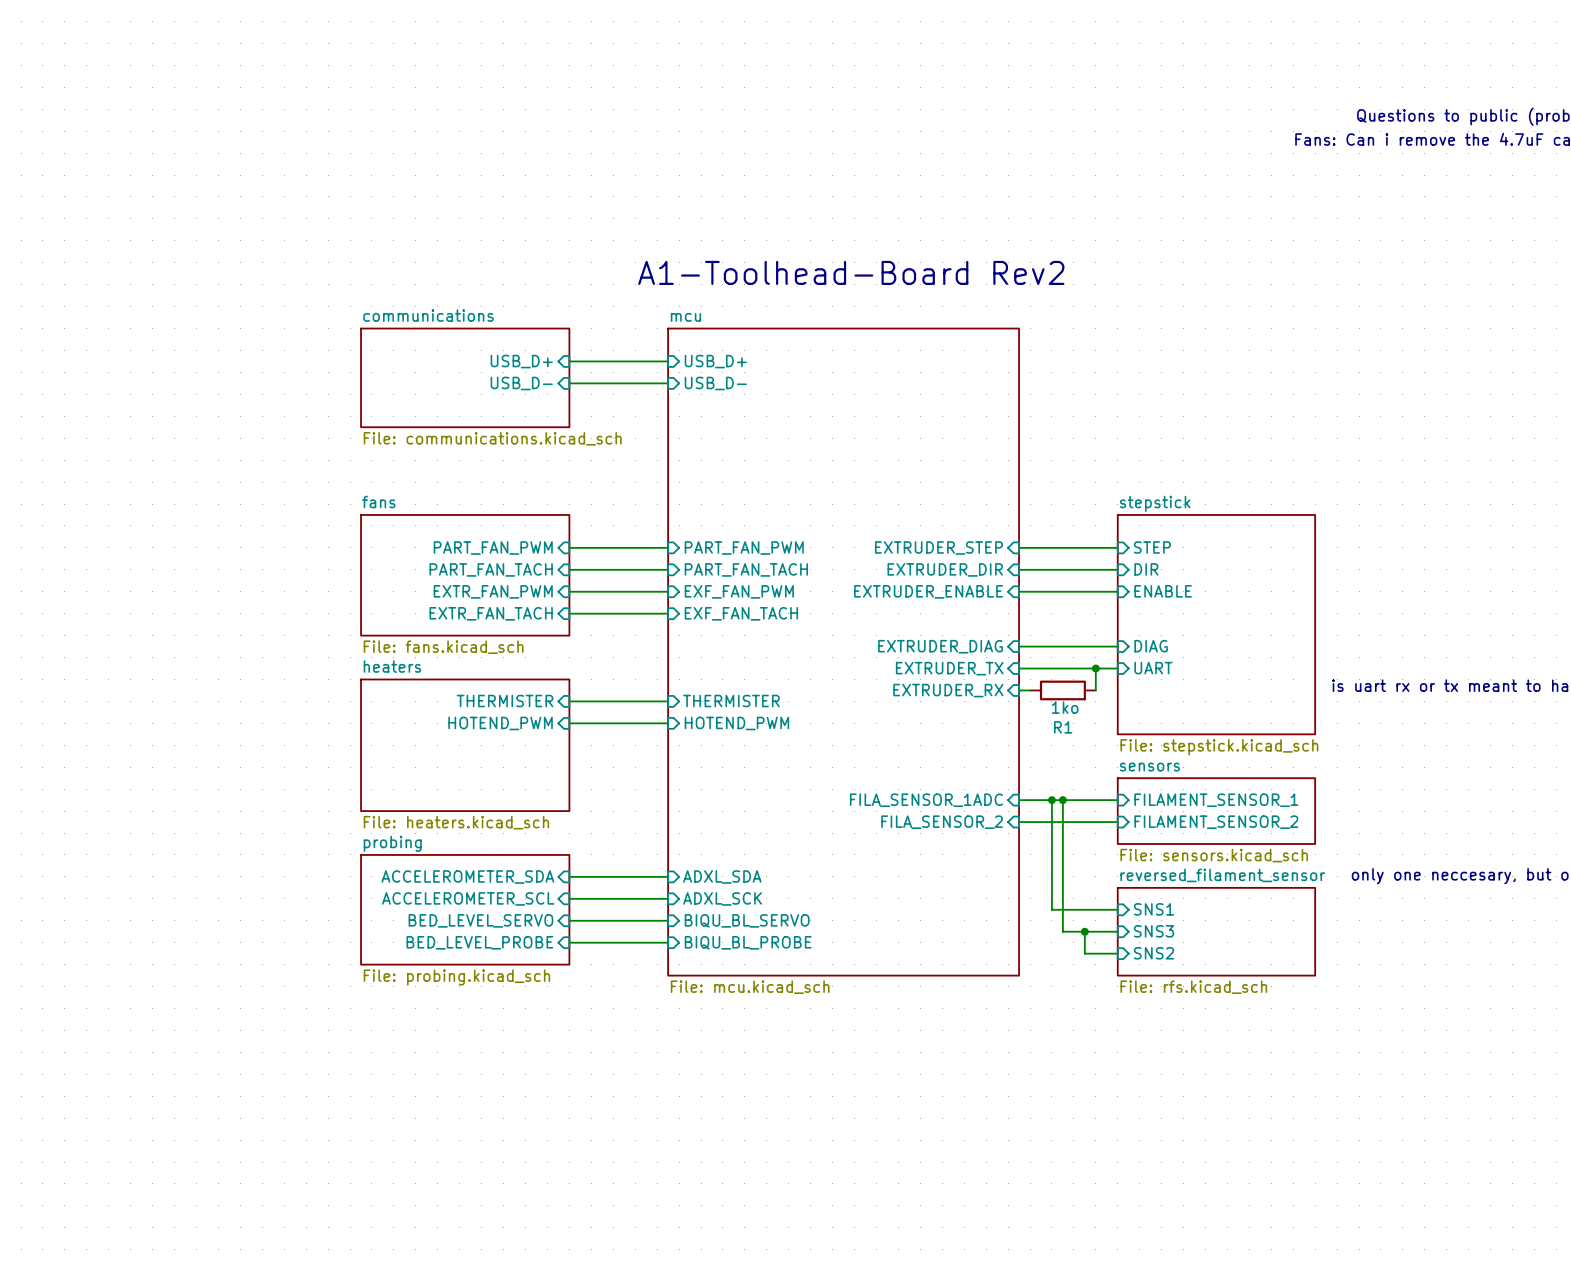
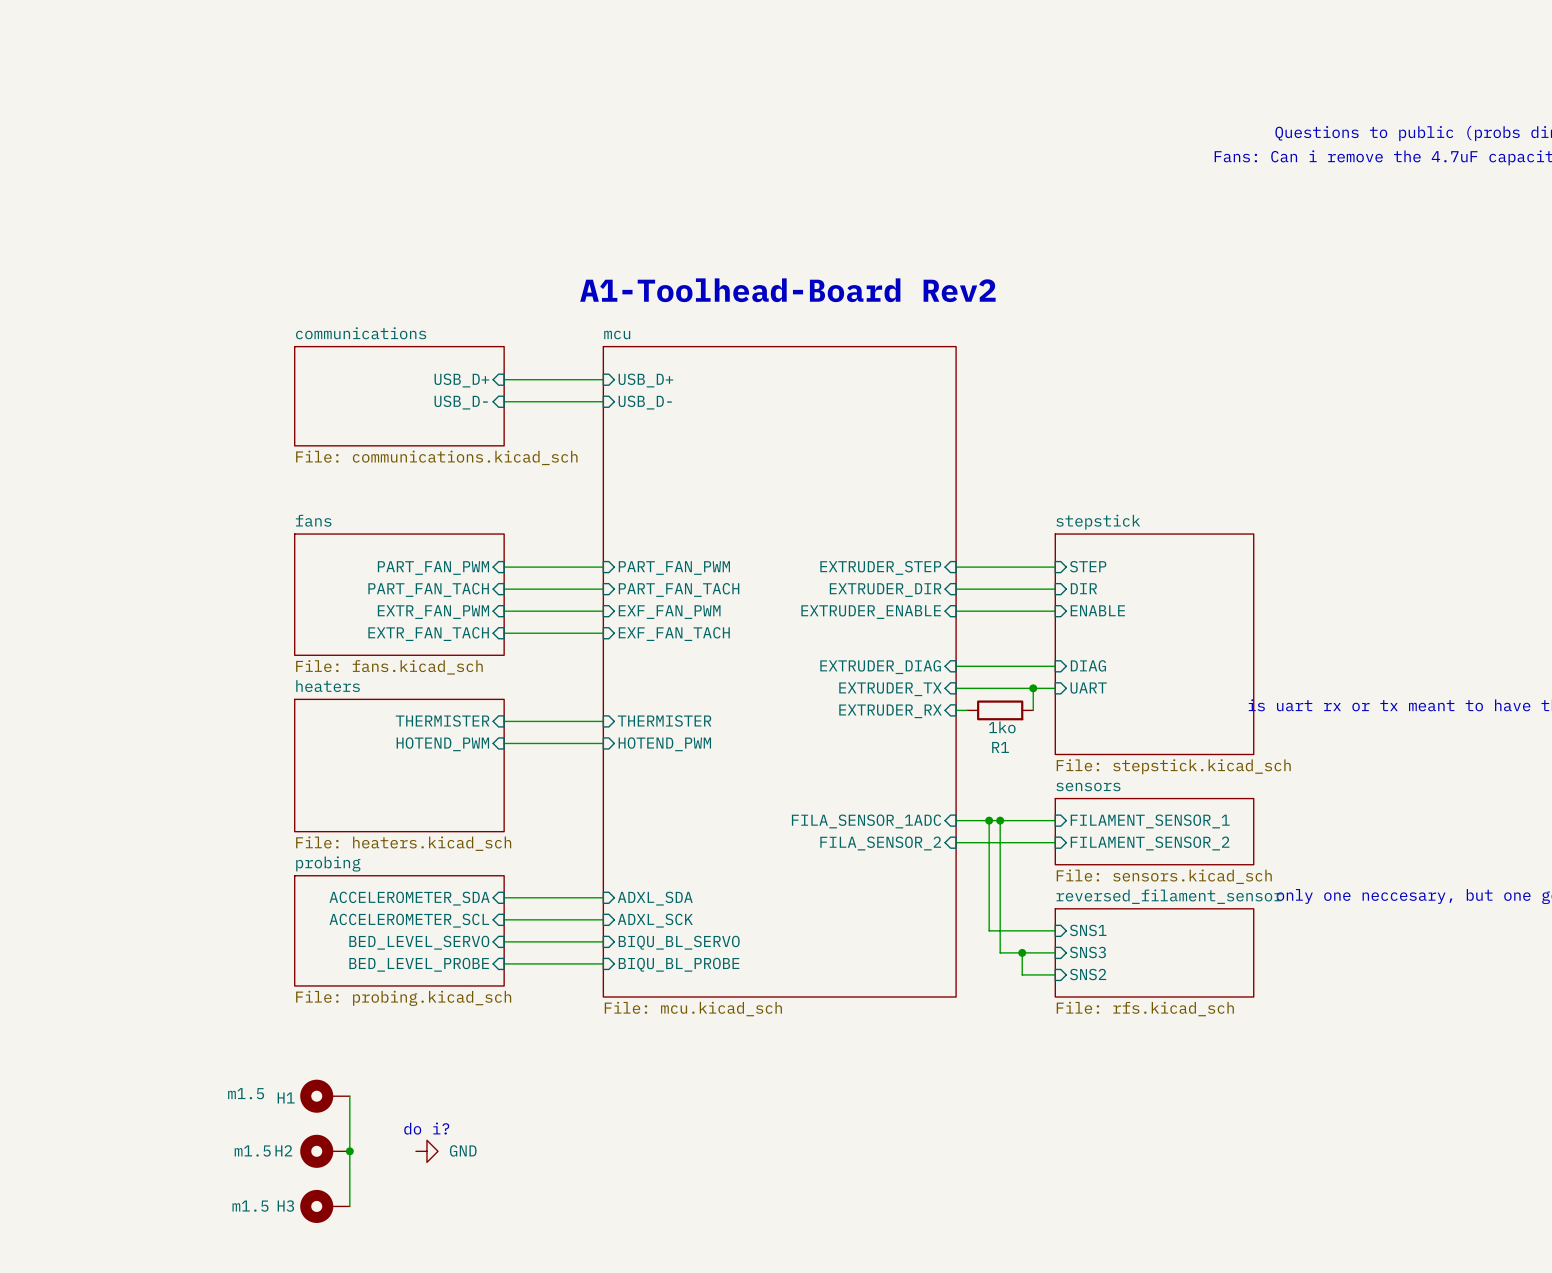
H1: none -> m1.5 (325, 1096)
wire: none -> (349, 1096) (349, 1206)
text: none -> do i? (426, 1128)
H2: none -> m1.5 (325, 1151)
junction: none -> (349, 1151)
power symbol: none -> GND (426, 1151)
H3: none -> m1.5 (325, 1206)

